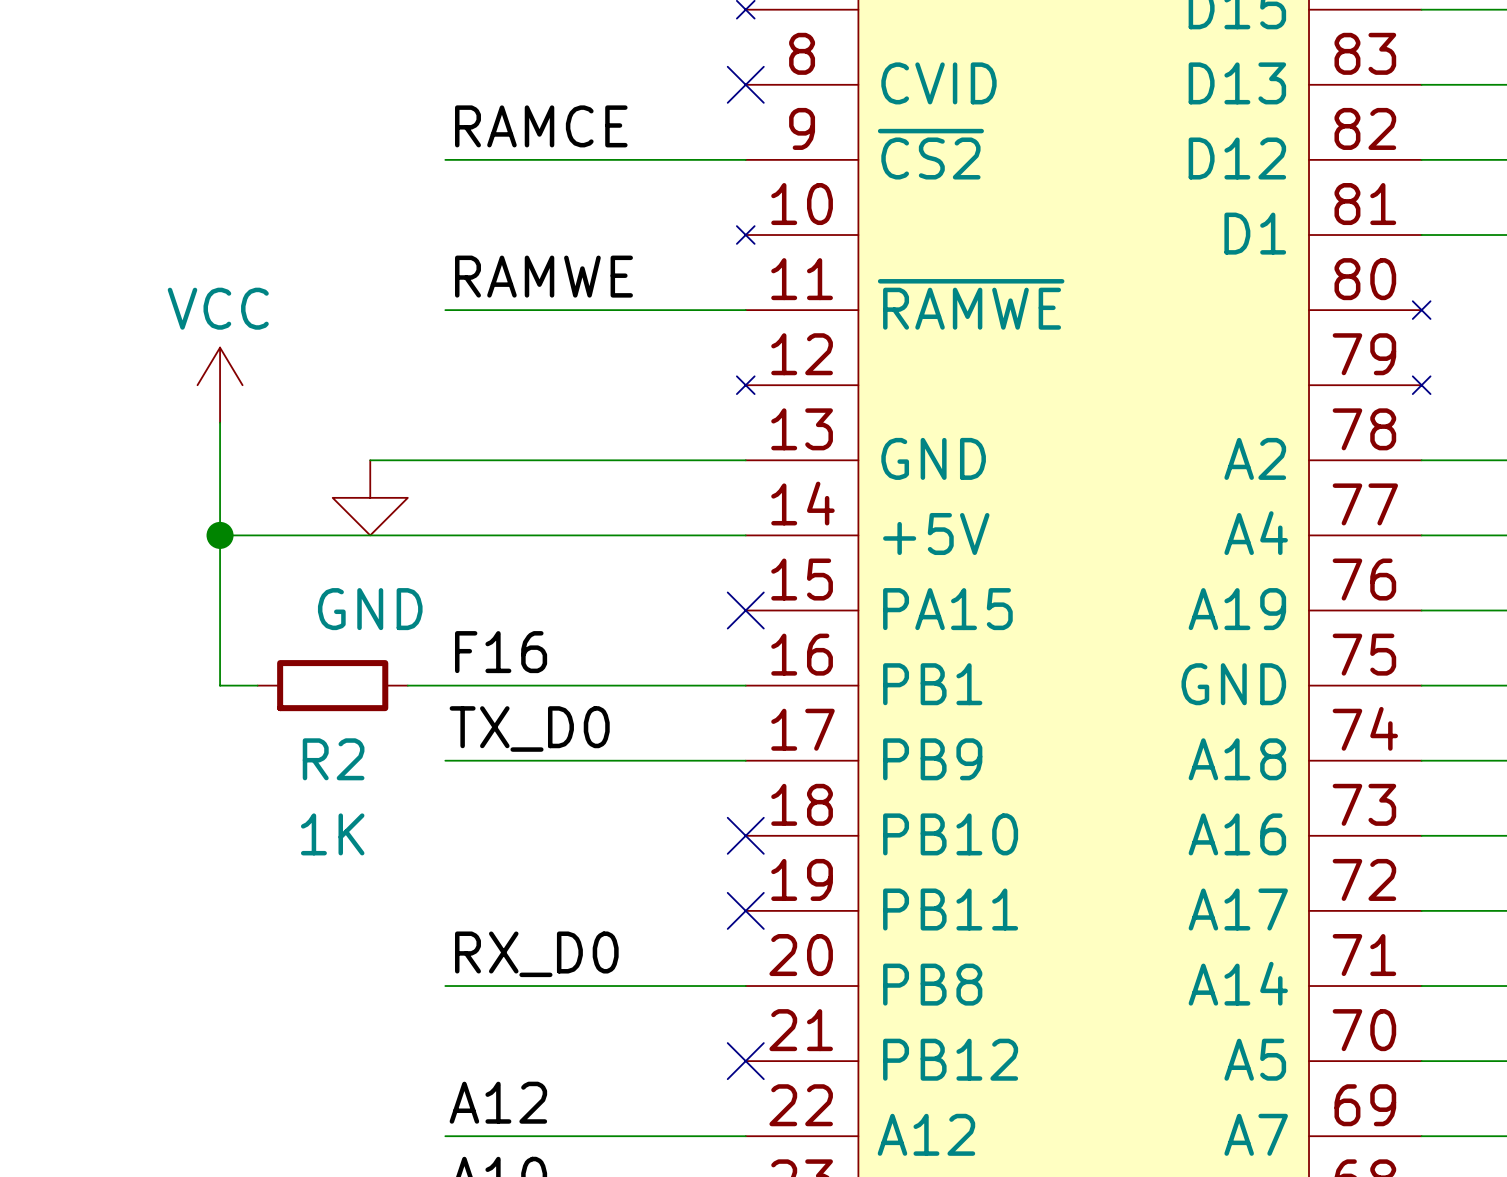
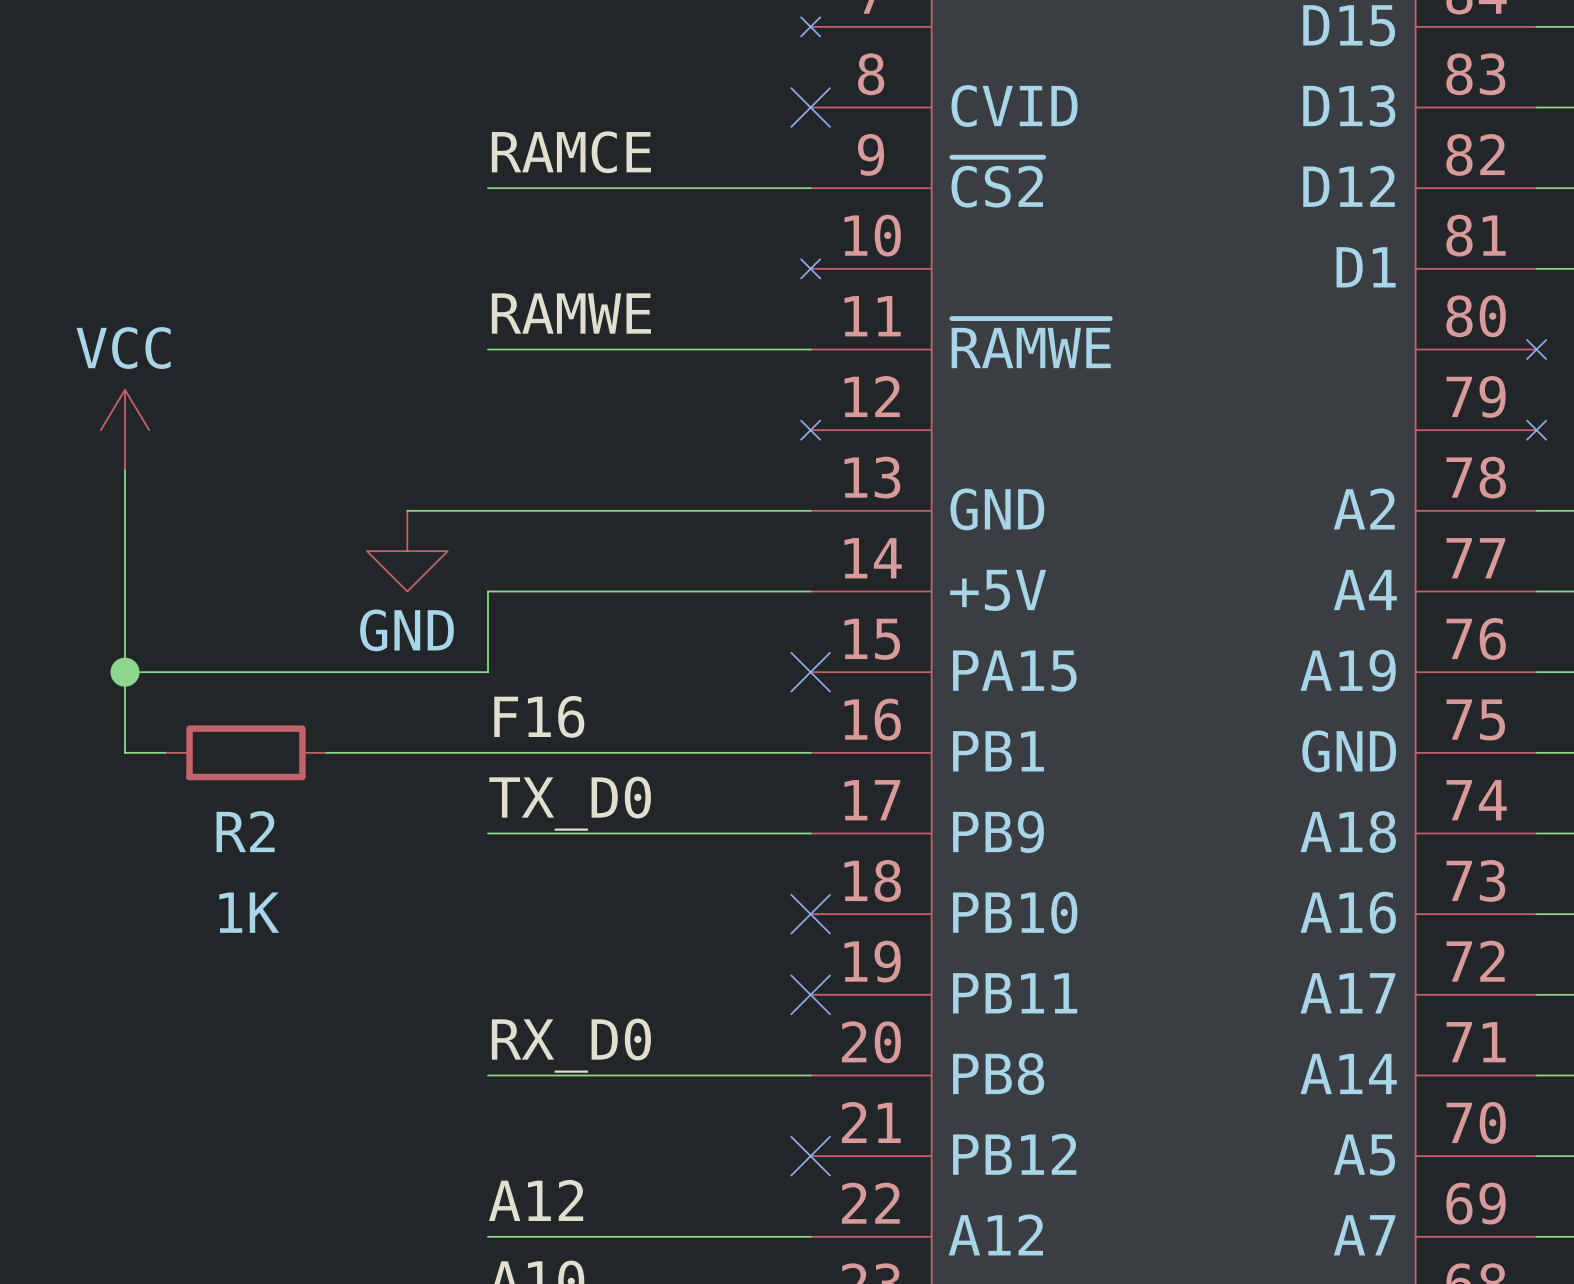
power symbol position: VCC (220, 385) -> VCC (125, 430)
wire: (220, 422) (220, 685) (257, 685) -> (125, 470) (125, 752) (165, 752)
wire: (220, 535) (445, 535) -> (125, 672) (487, 672) (487, 591)
junction position: (220, 535) -> (125, 672)
power symbol text position: GND (370, 609) -> GND (406, 630)
wire: none -> (326, 752) (447, 752)
R2 position: (332, 685) -> (246, 752)

